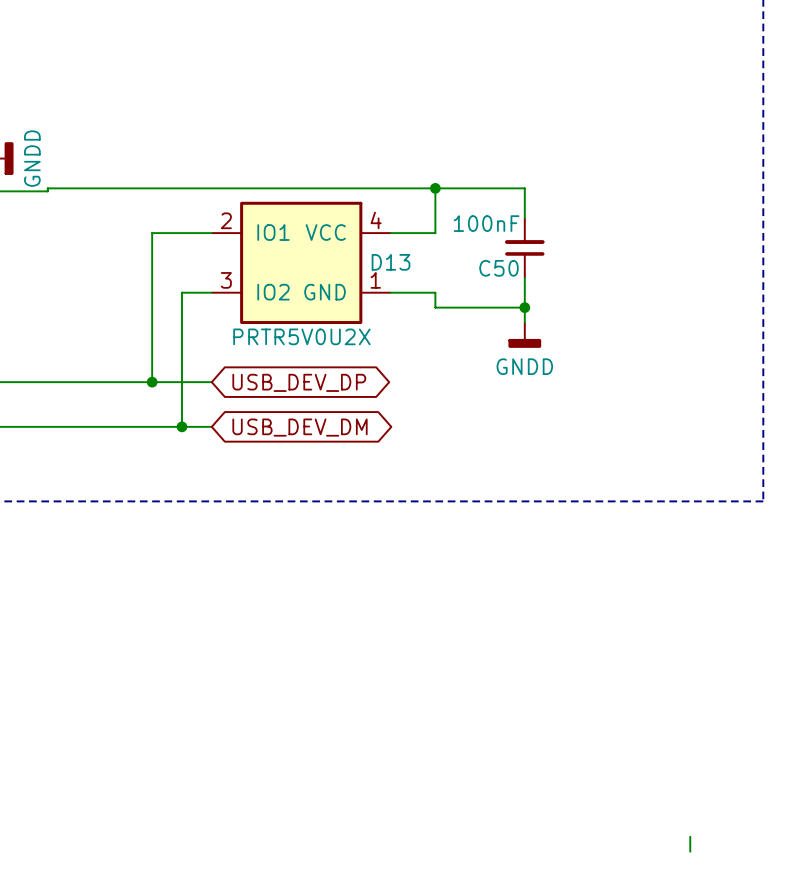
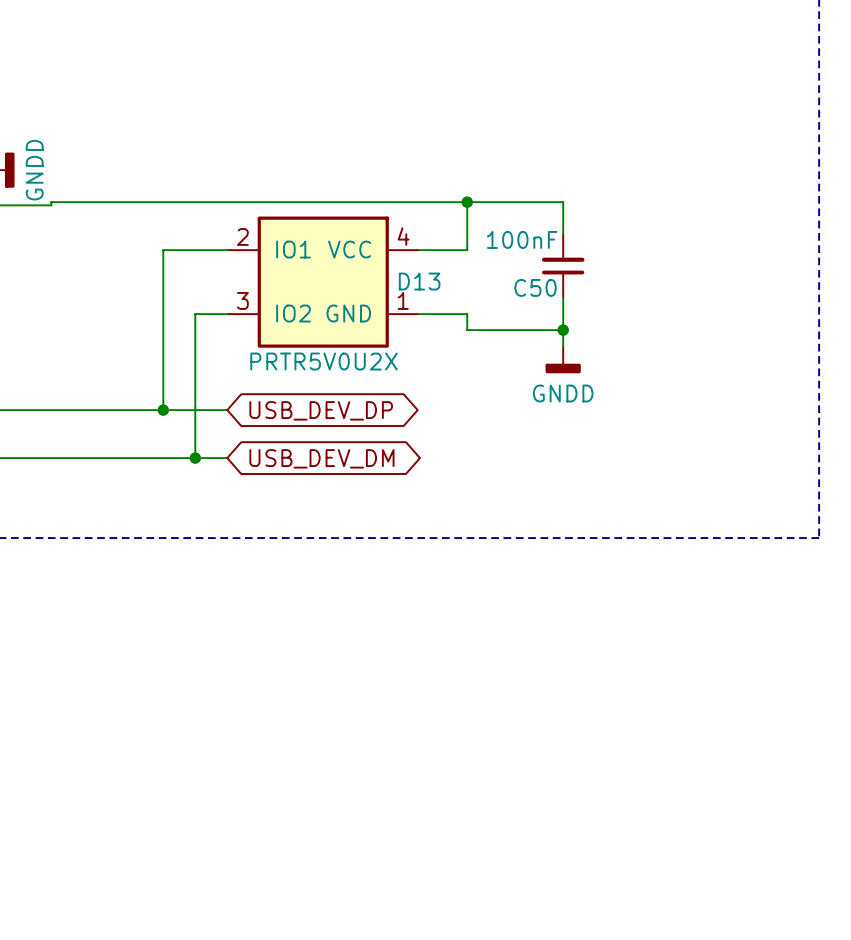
wire: (690, 836) (690, 851) -> none

